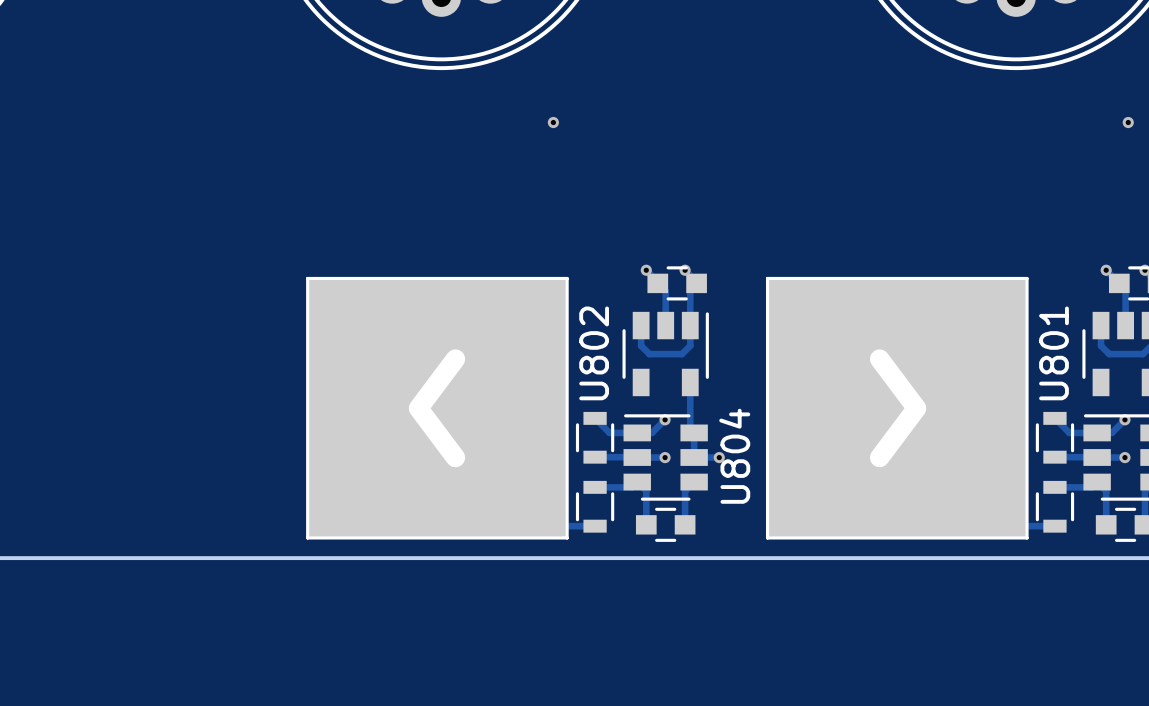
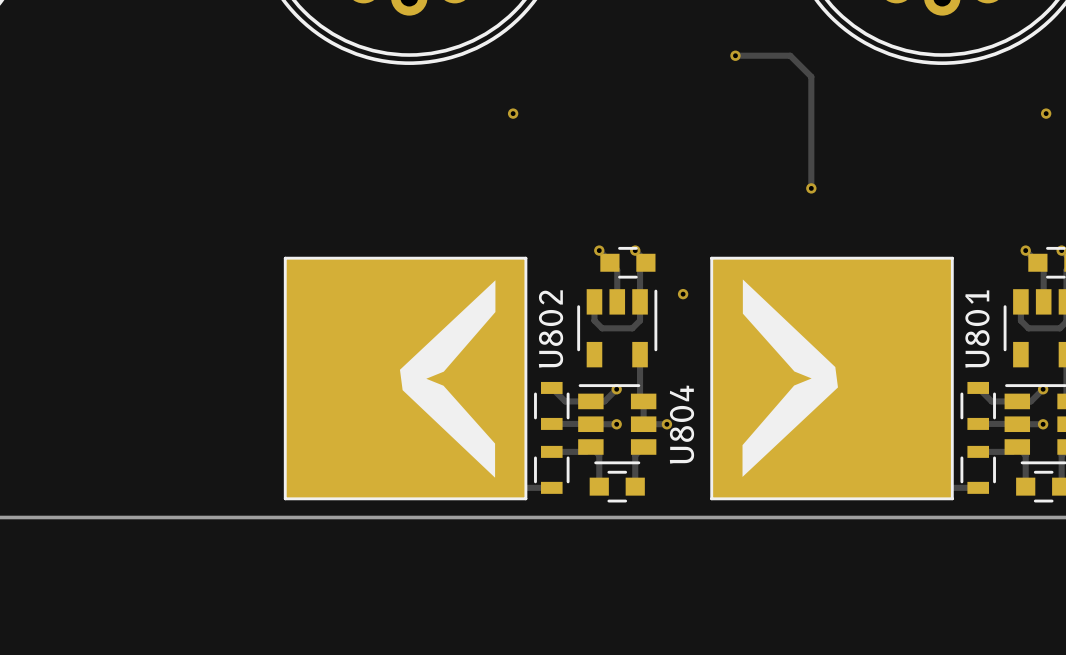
track: none -> (735, 55) (790, 55) (811, 76) (811, 188)
via: none -> (735, 55)
via: none -> (811, 188)
via: none -> (683, 294)

